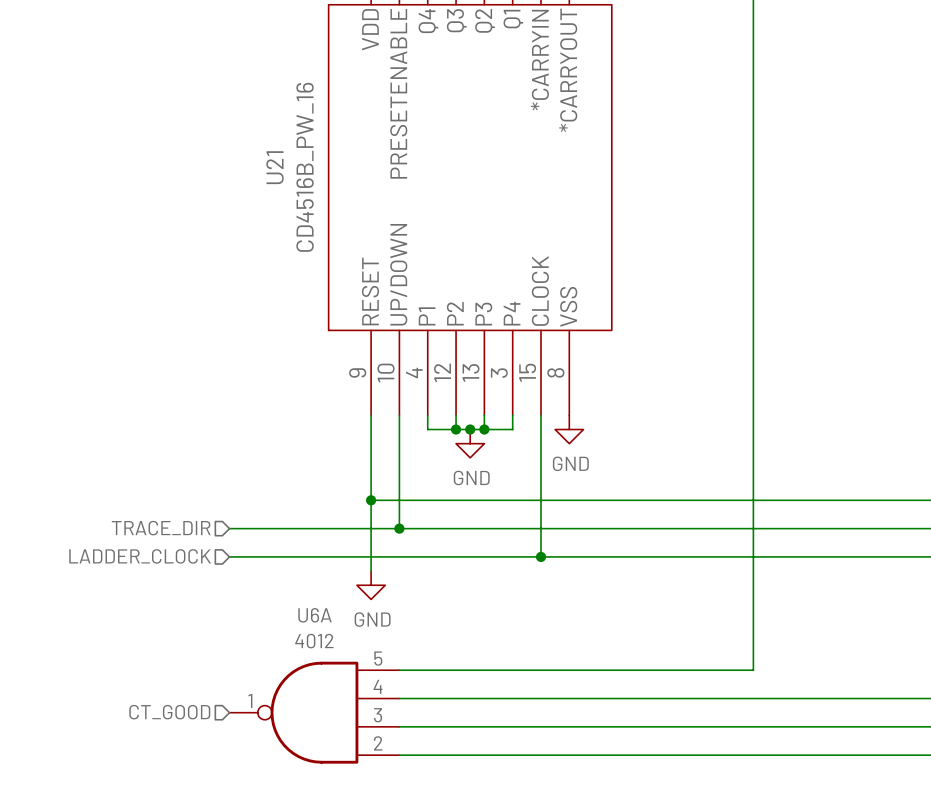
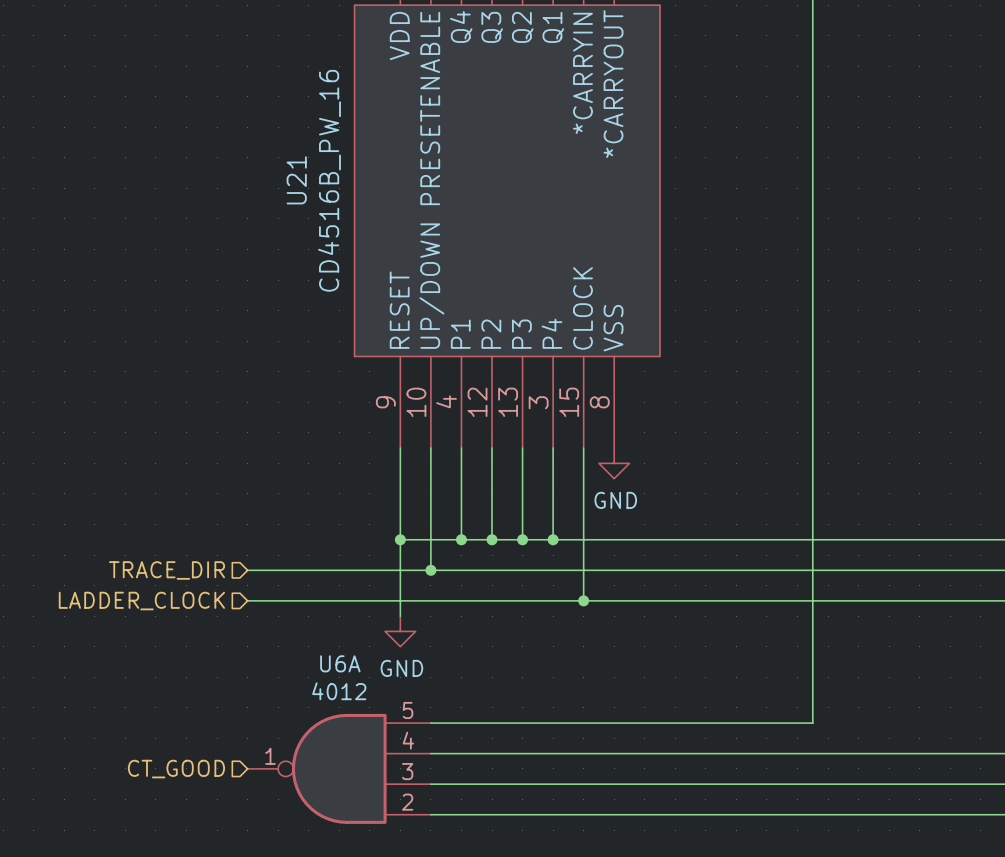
wire: (427, 429) (512, 429) -> (461, 463) (461, 539)
wire: none -> (492, 463) (492, 539)
junction: (456, 429) -> none
junction: (470, 429) -> none
wire: none -> (522, 463) (522, 539)
junction: (484, 429) -> none
wire: none -> (553, 463) (553, 539)
power symbol: GND (470, 443) -> none
junction: none -> (461, 539)
junction: none -> (492, 539)
junction: none -> (522, 539)
junction: none -> (553, 539)

